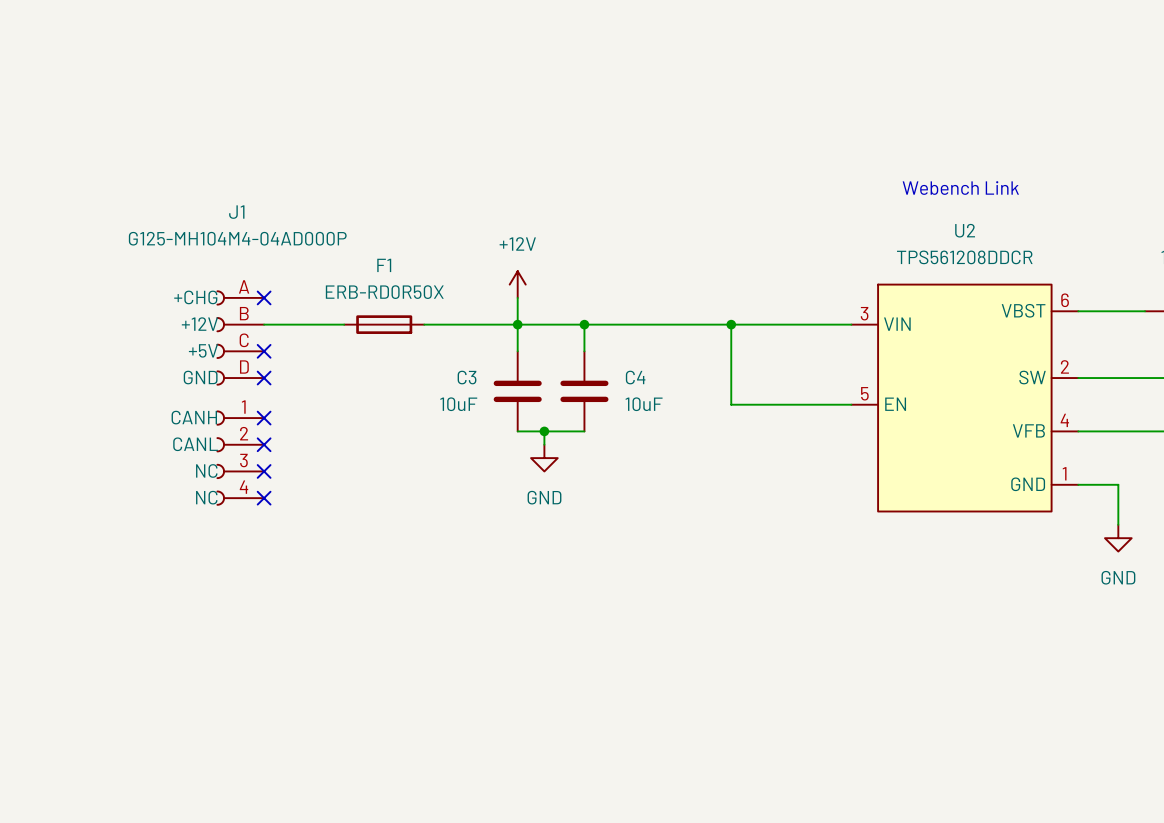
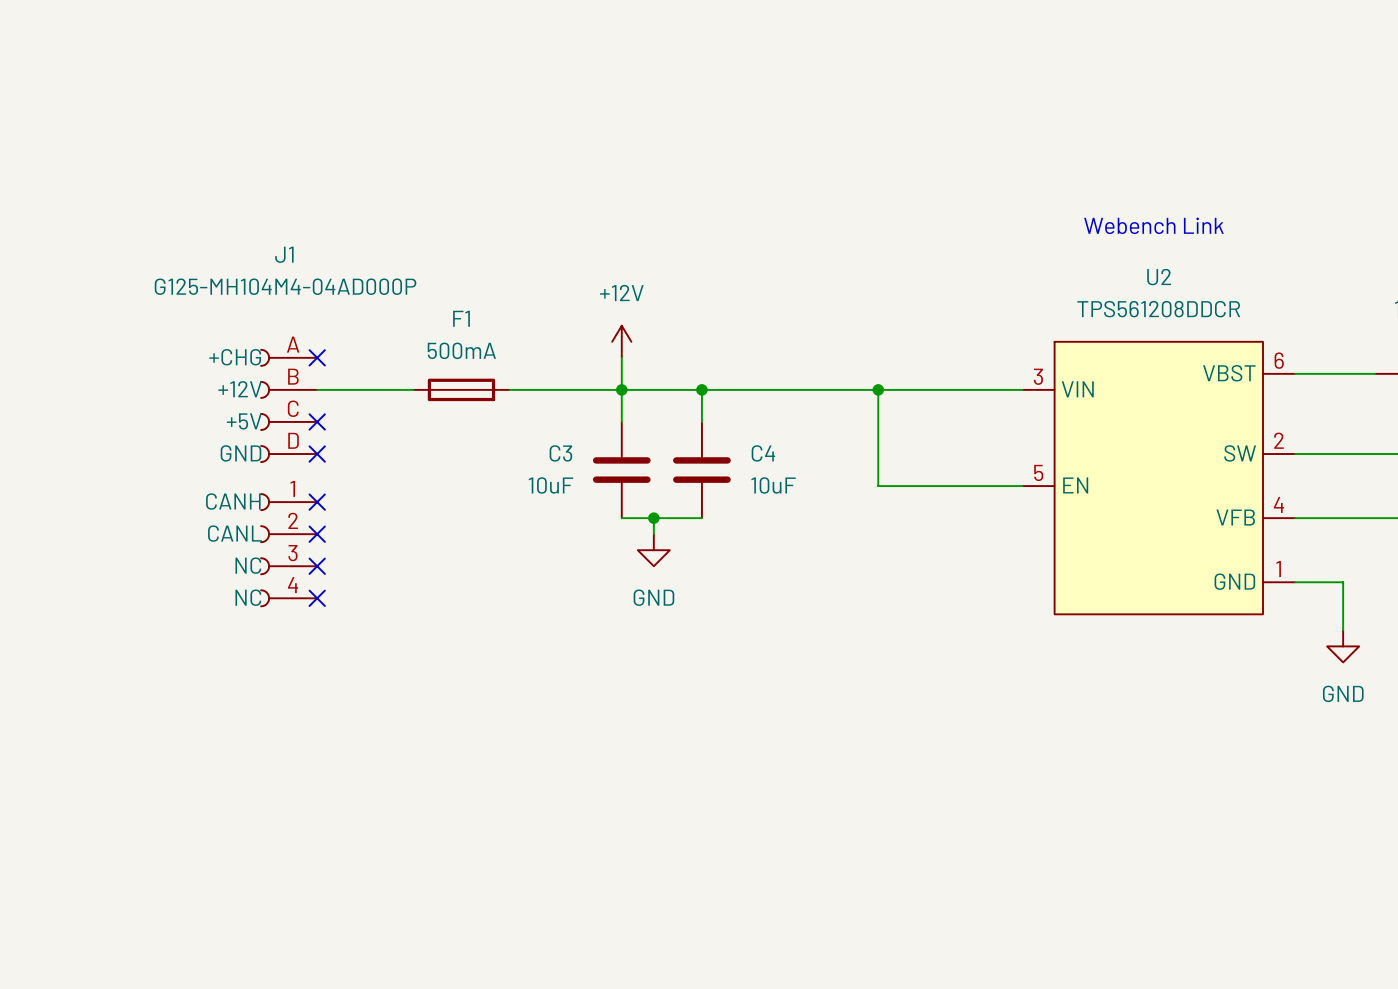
F1 value: ERB-RD0R50X (384, 292) -> 500mA (461, 350)

